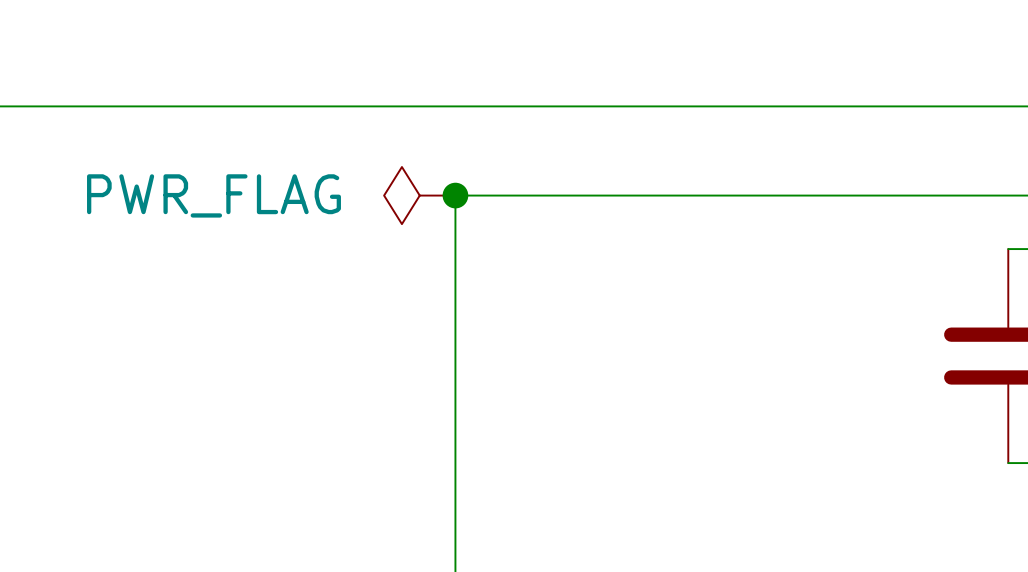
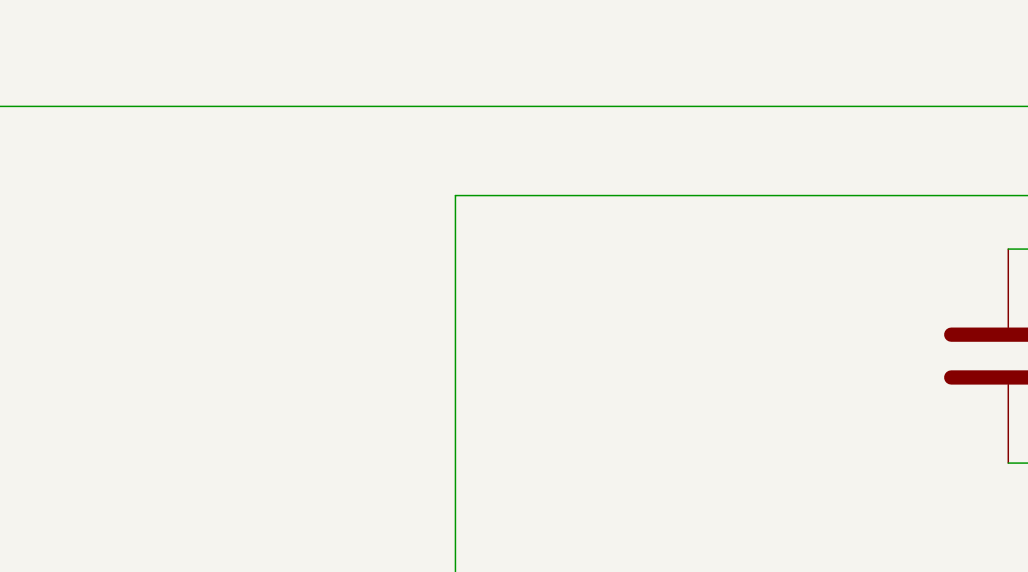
power symbol: PWR_FLAG (419, 195) -> none
junction: (455, 195) -> none

